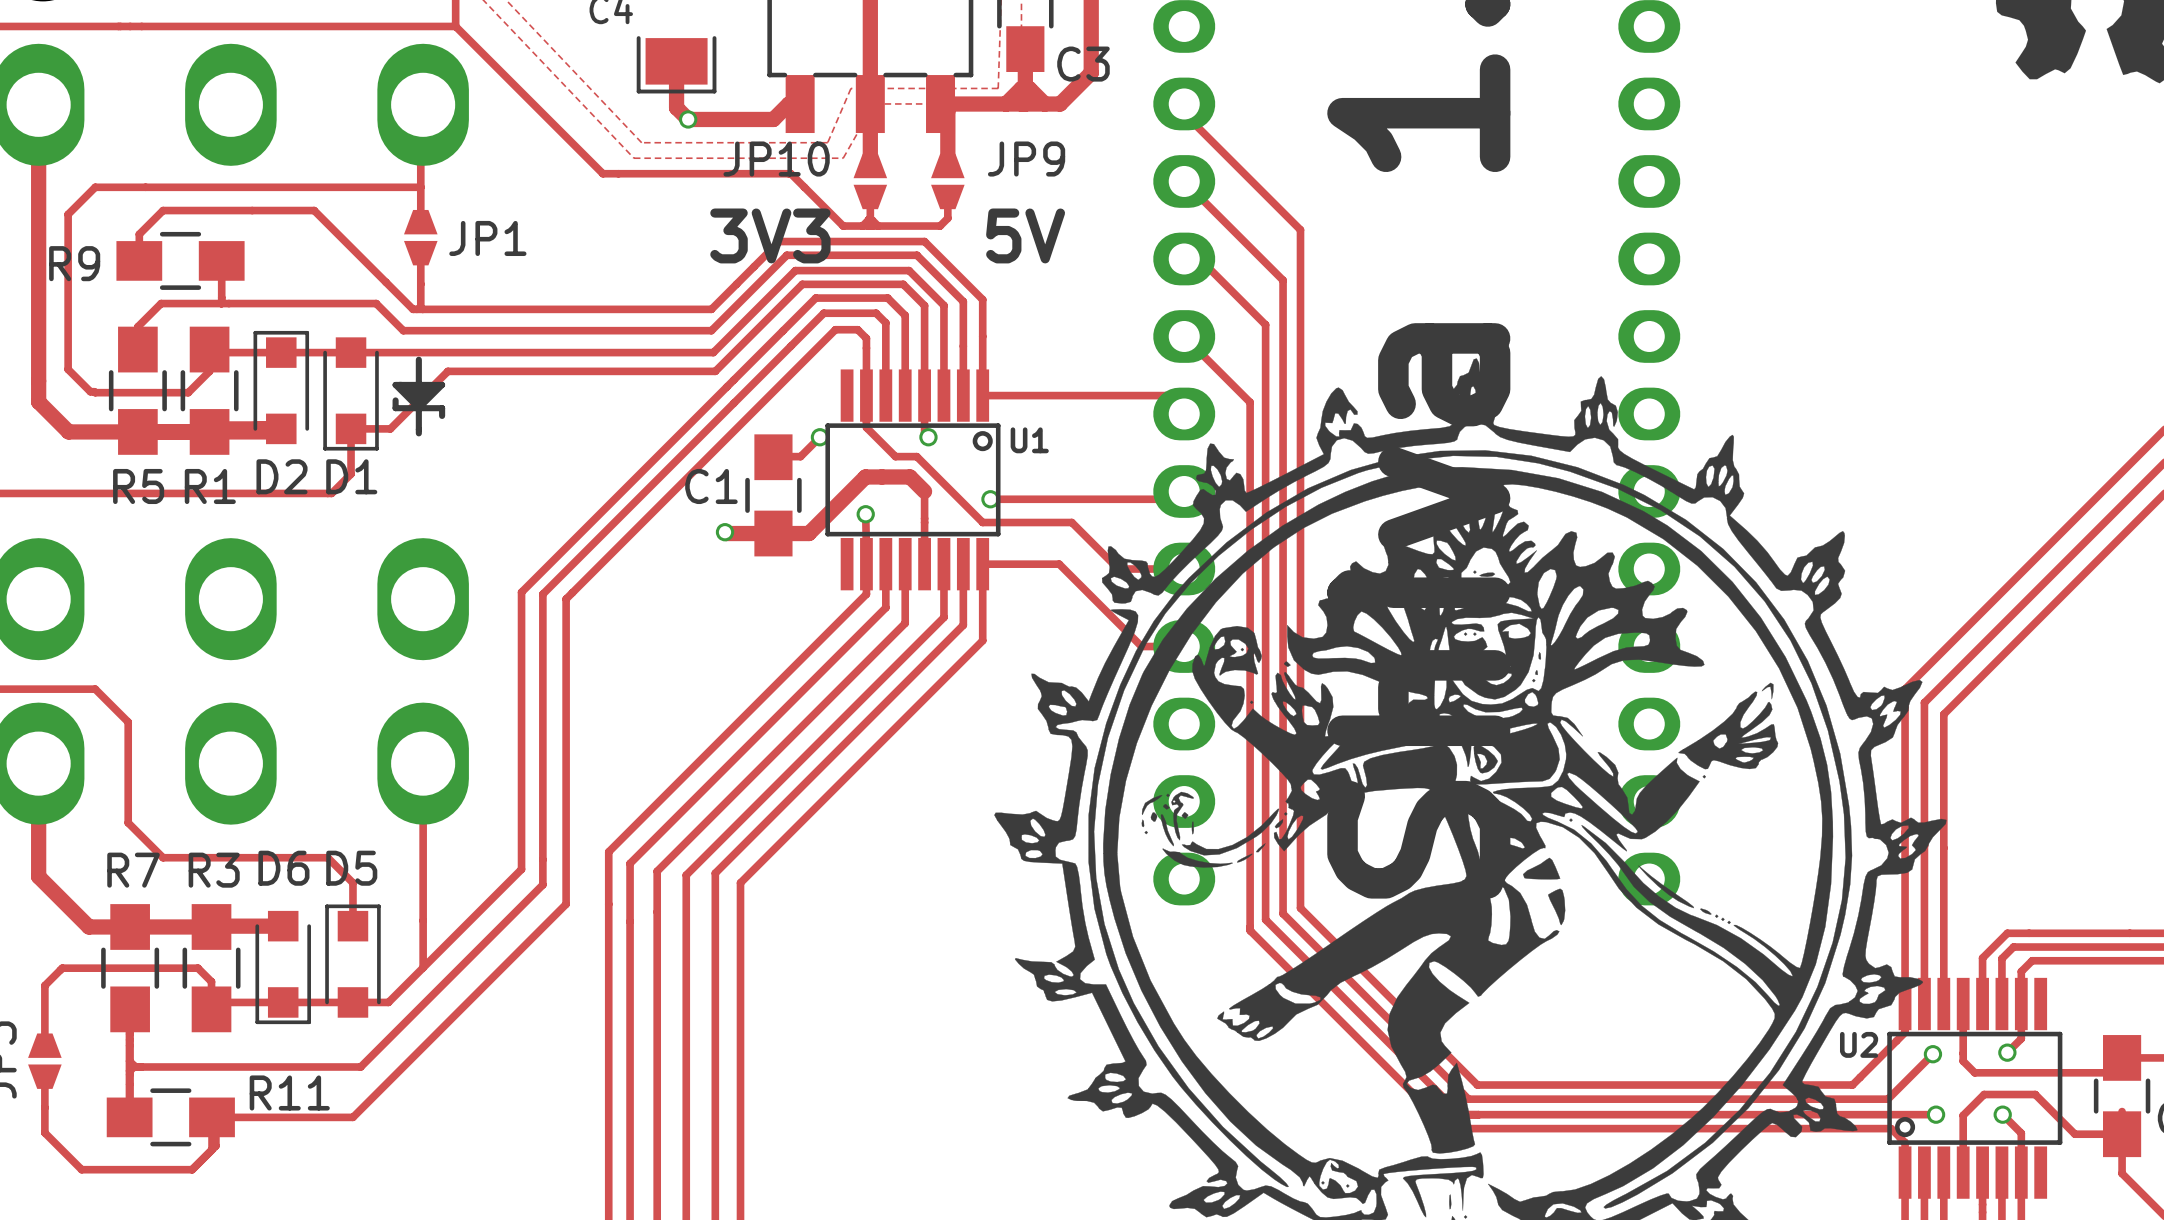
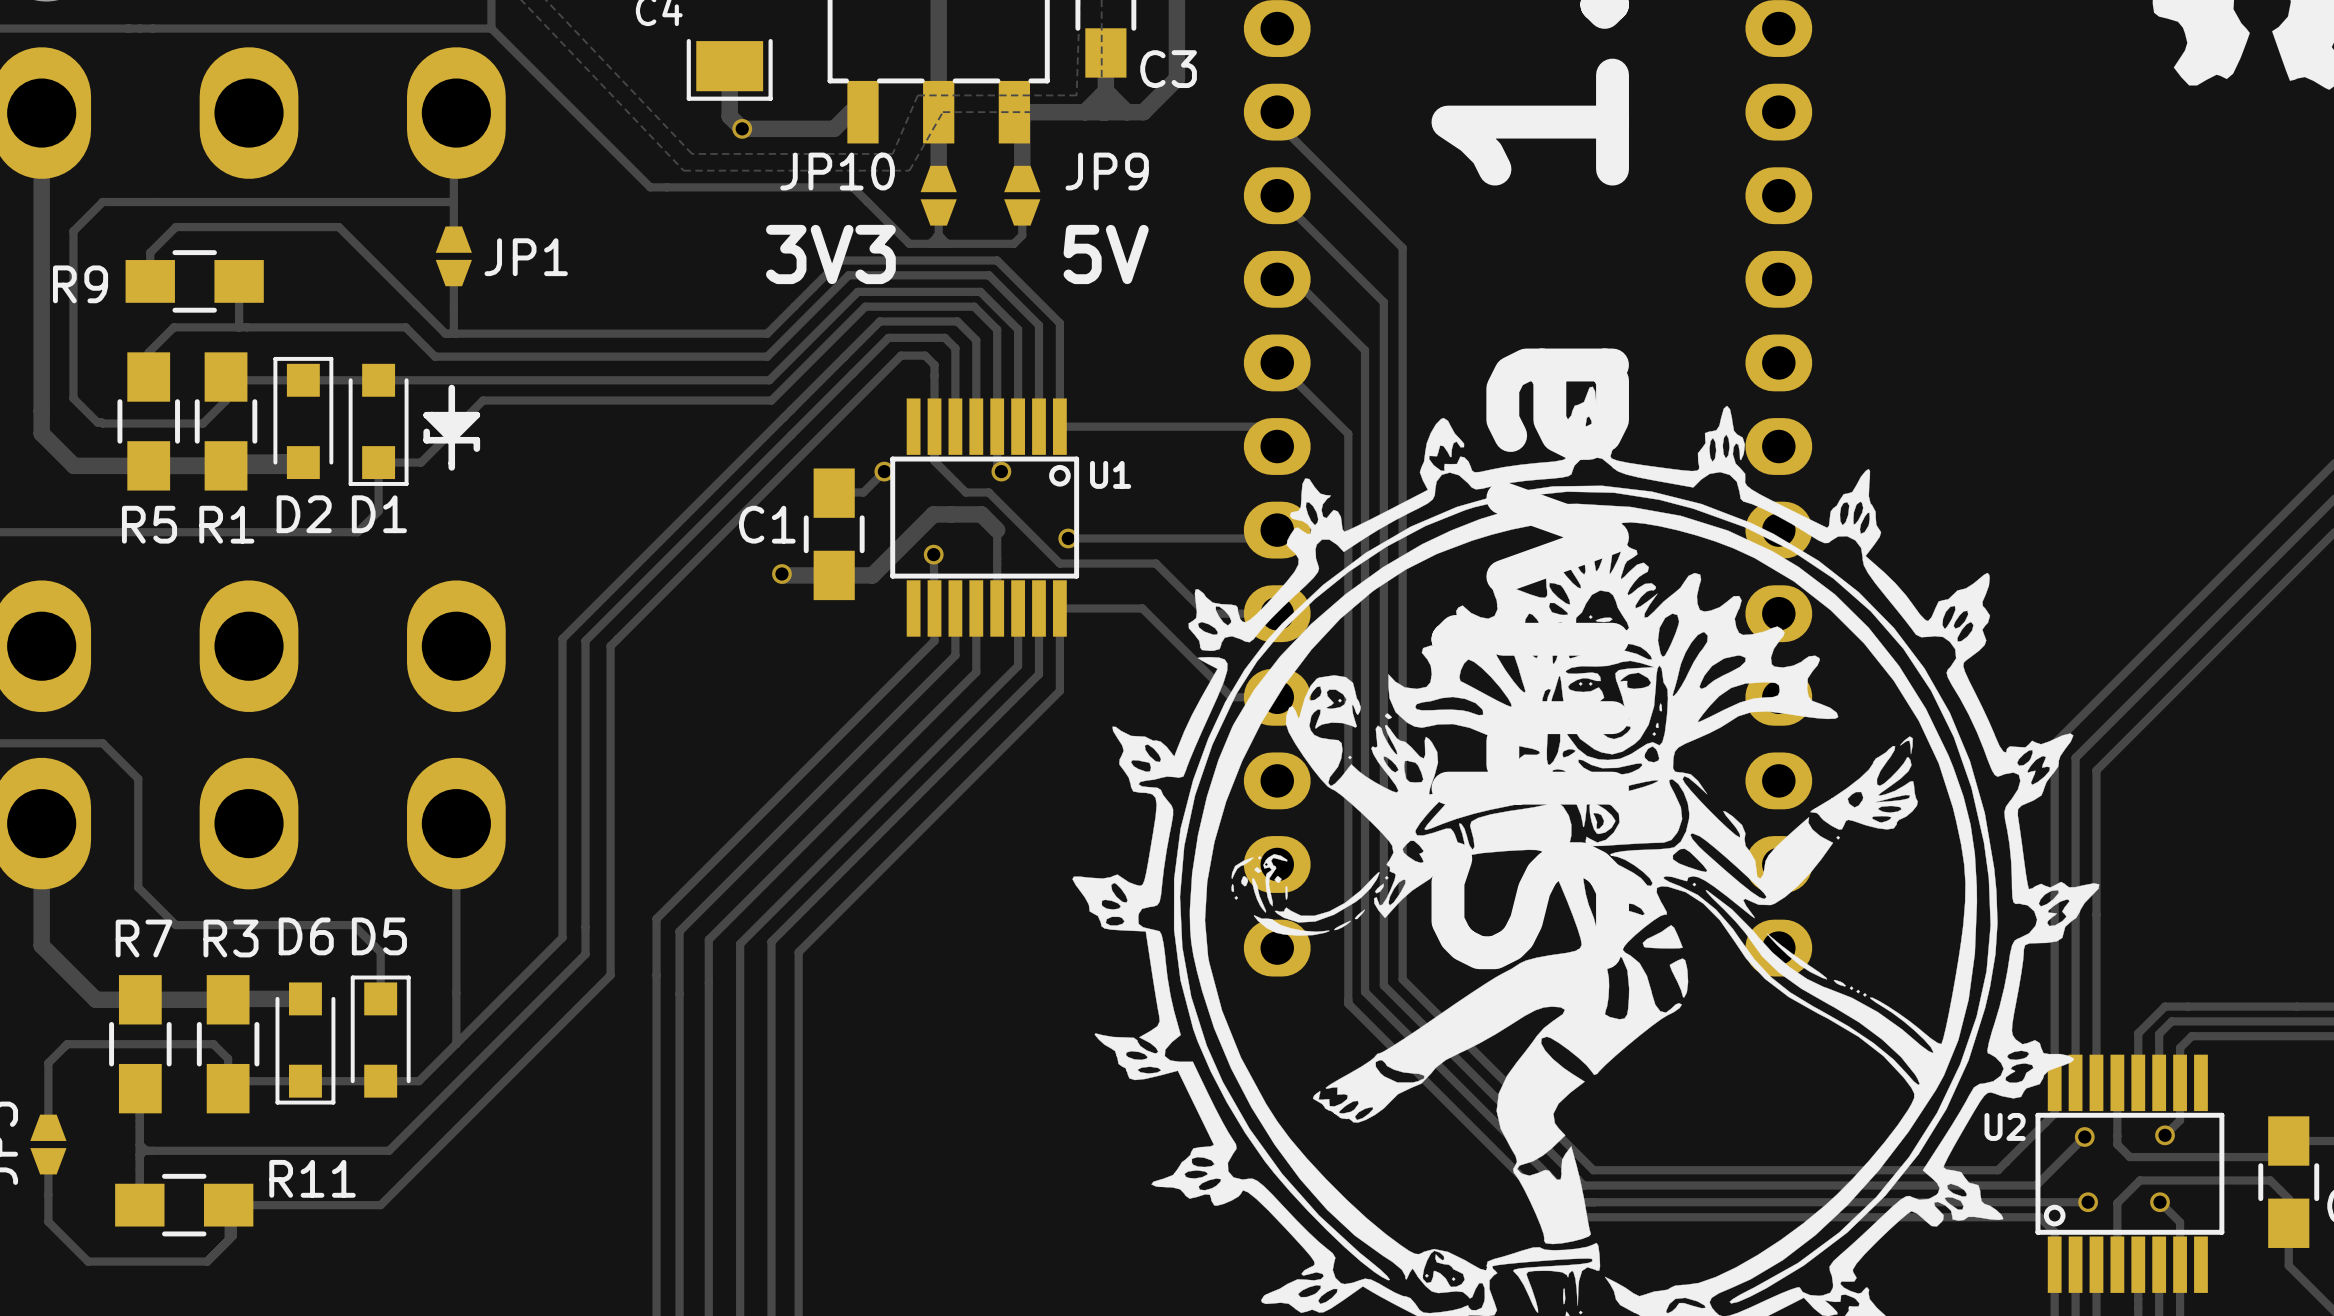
track: (2035, 1094) (2074, 1134) (2122, 1134) -> (2195, 1180) (2270, 1180) (2288, 1198)

